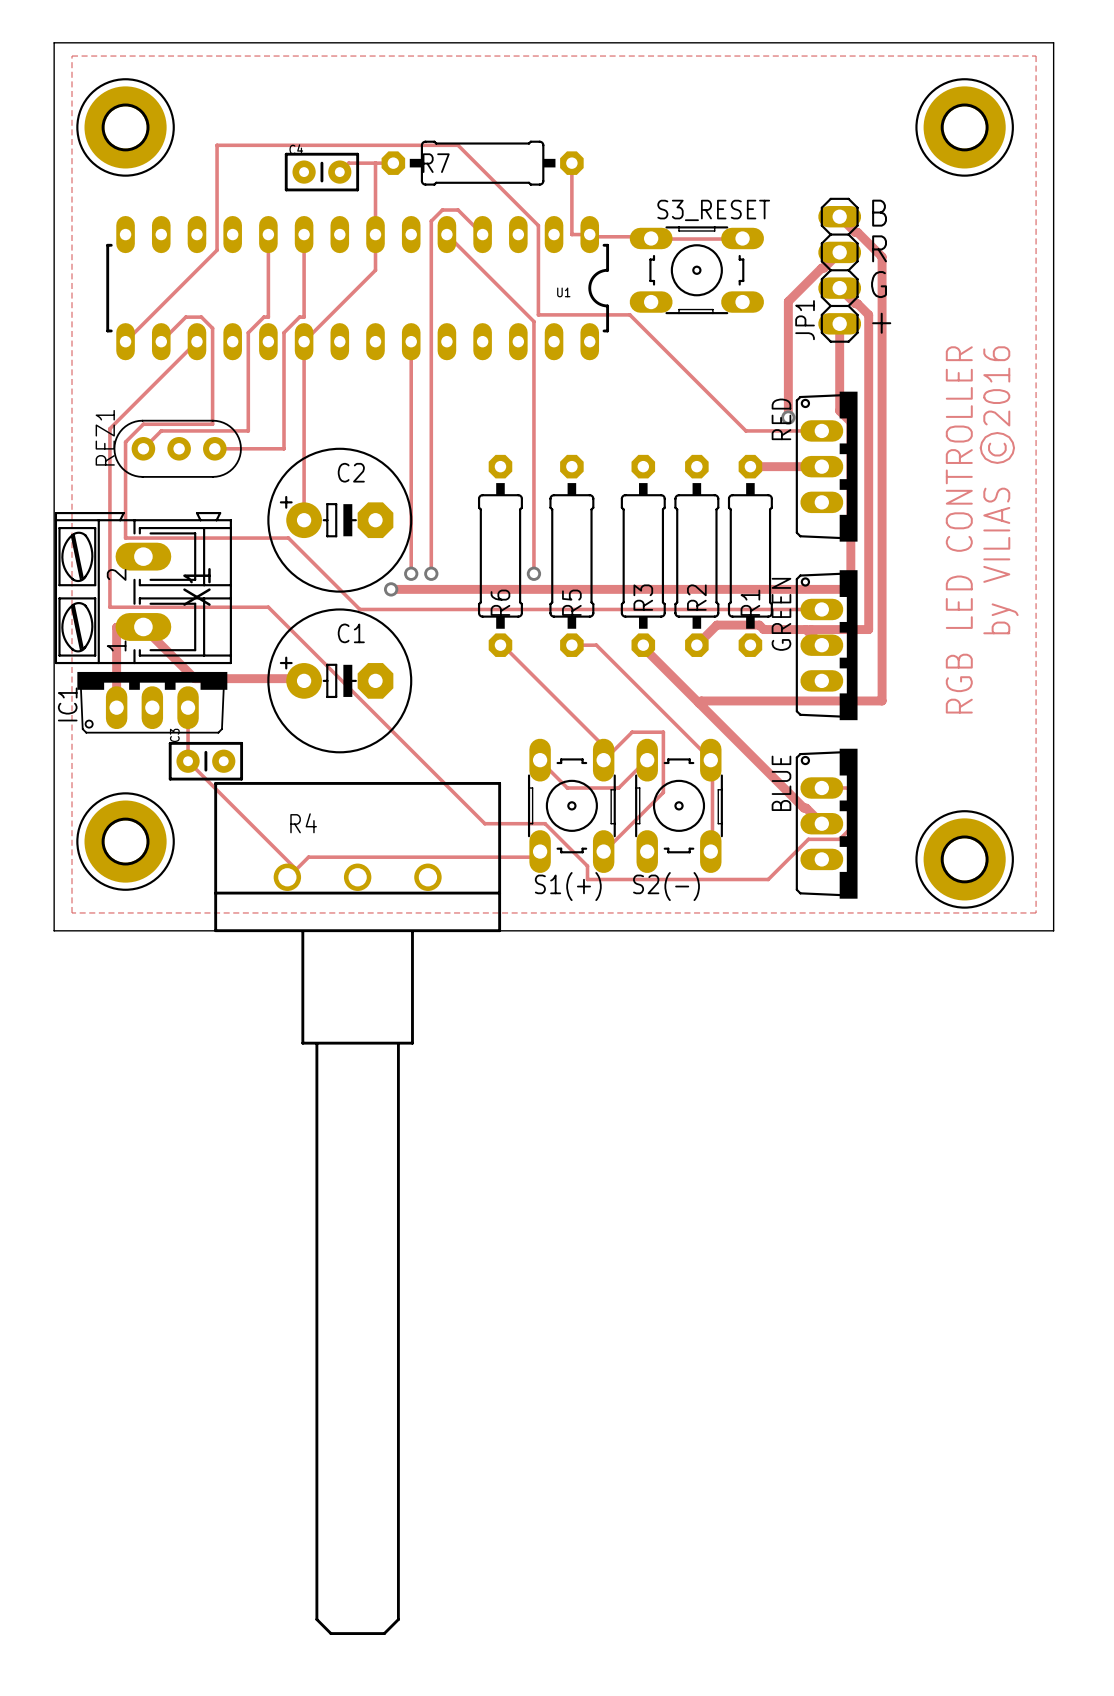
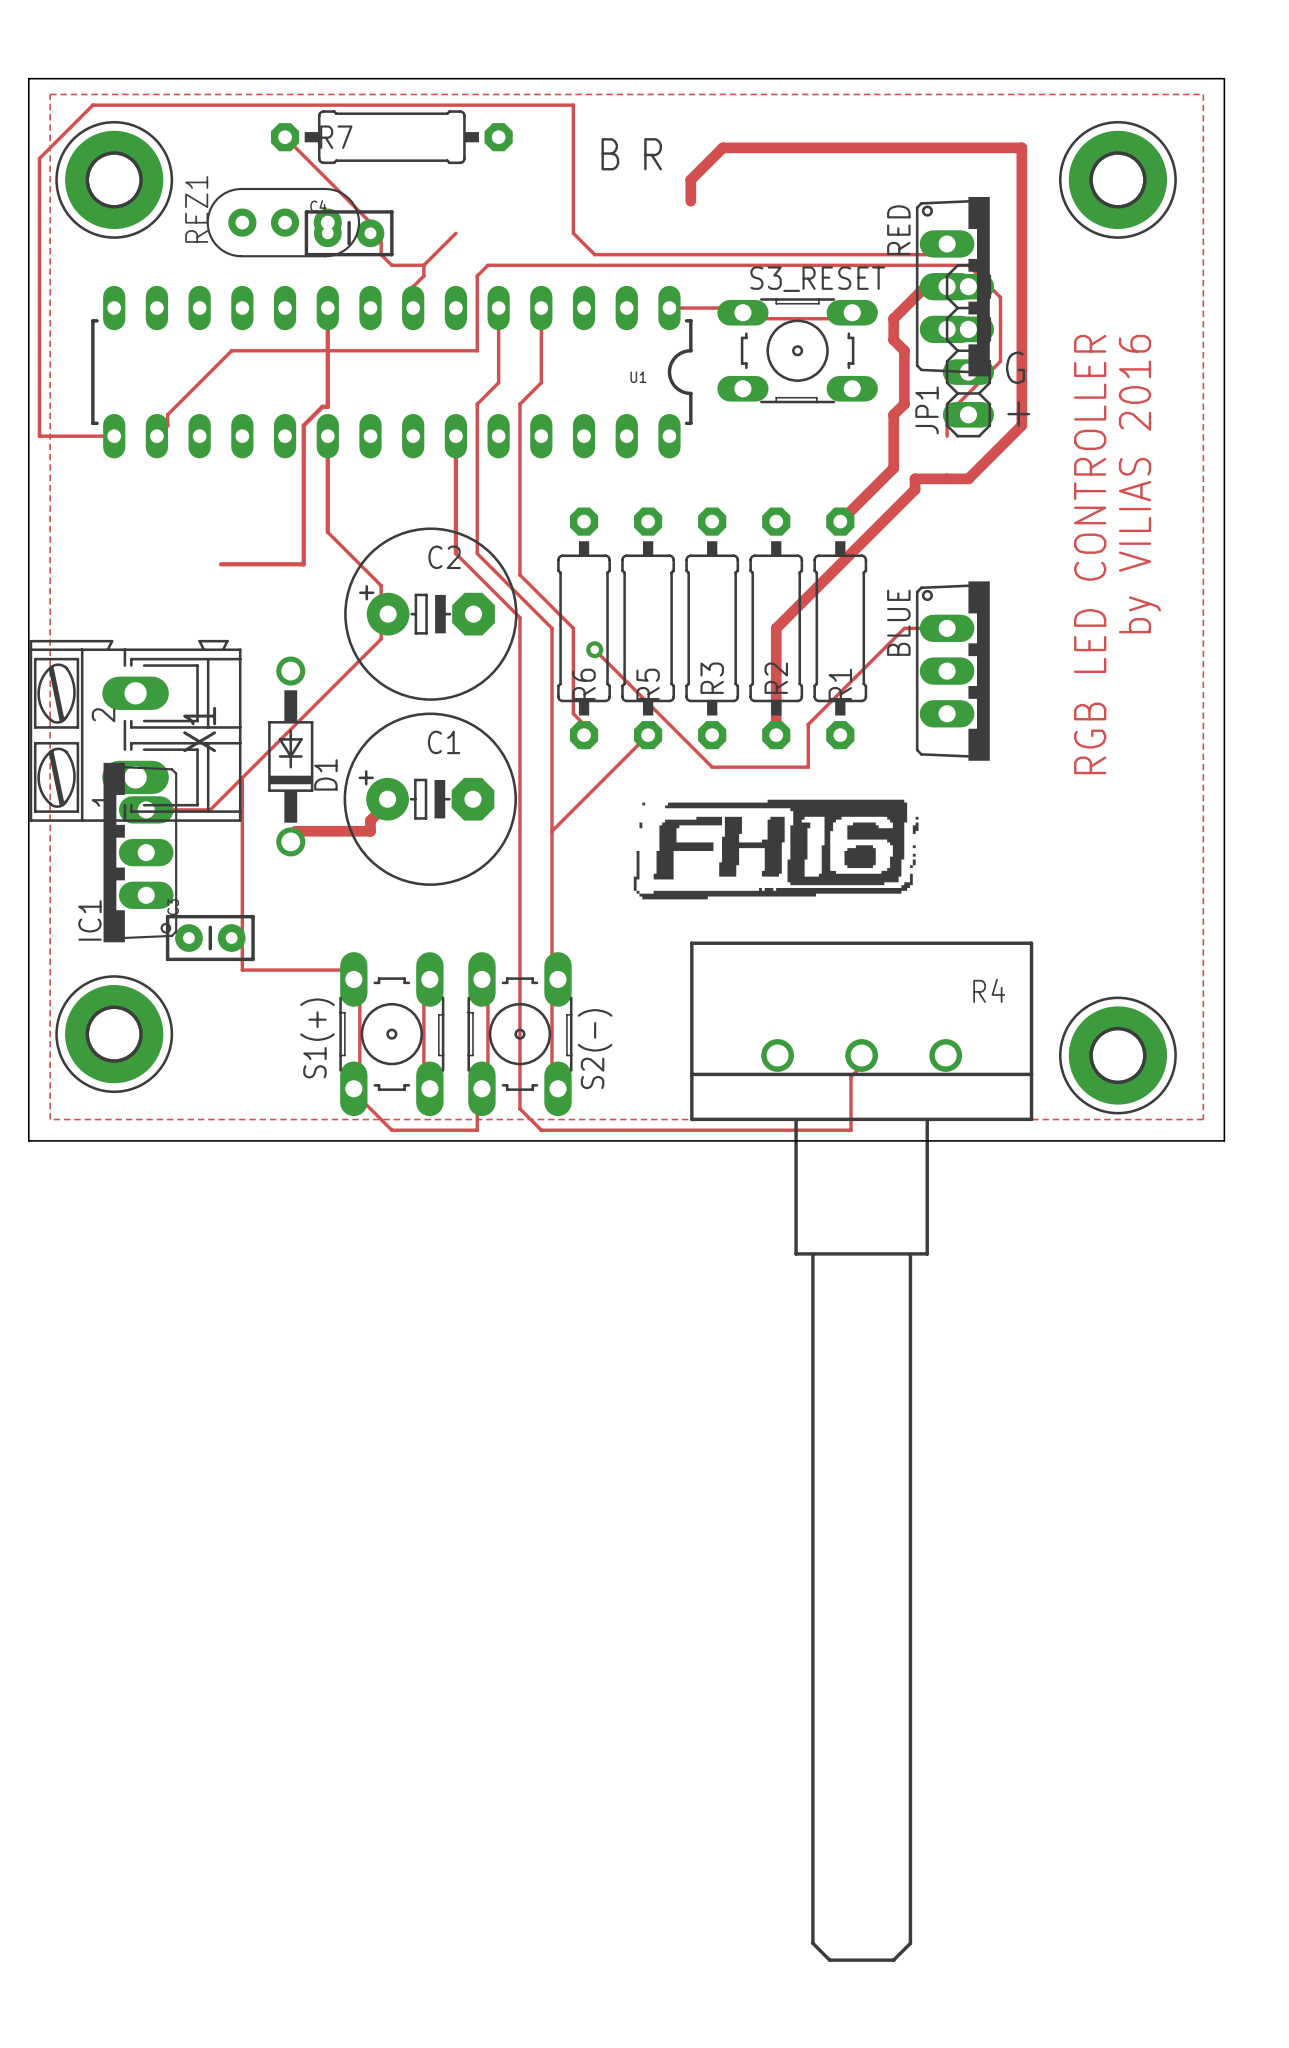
track: none -> (285, 137) (381, 233) (381, 254) (391, 265) (423, 265)
text: none -> B (610, 154)
track: none -> (690, 201) (690, 179) (722, 147) (1021, 147) (1021, 425) (968, 478) (915, 478) (915, 489) (776, 628) (776, 735)
track: (375, 163) (375, 216) -> (423, 265) (423, 276) (413, 286)
track: (393, 163) (348, 163) (339, 172) -> none
R7 position: (482, 163) -> (391, 137)
track: (571, 163) (571, 234) (589, 234) (591, 236) (649, 236) (652, 239) (742, 238) -> (669, 308) (733, 308) (742, 312) (744, 318) (850, 318) (852, 312)
track: none -> (455, 233) (423, 265)
text: B (879, 213) -> none
track: none -> (947, 286) (925, 286) (893, 318) (893, 340) (904, 350) (904, 404) (893, 414) (893, 468) (840, 521)
RED: none -> (952, 286)
track: (839, 216) (882, 256) (882, 700) (701, 700) (699, 703) -> none
track: (268, 234) (268, 317) (263, 317) (248, 332) (248, 430) (161, 430) (143, 448) -> none
track: (375, 234) (375, 270) (304, 341) -> none
track: (446, 234) (533, 321) (533, 573) -> (498, 308) (498, 382) (477, 404) (477, 553) (552, 628) (552, 831)
track: (482, 234) (458, 210) (442, 210) (431, 221) (431, 573) -> (541, 308) (541, 382) (519, 404) (519, 574) (573, 628) (573, 713) (584, 724) (584, 735)
text position: R (879, 248) -> R (653, 154)
track: (839, 252) (788, 301) (788, 417) -> none
track: (839, 288) (868, 314) (868, 629) (810, 629) (808, 631) -> none
track: (839, 323) (839, 410) (850, 422) (850, 589) (391, 589) -> none
track: (170, 332) (185, 317) (201, 317) (212, 328) (212, 424) (143, 424) (125, 442) (125, 538) (288, 538) (359, 609) (821, 609) -> (167, 425) (167, 414) (231, 350) (477, 350) (477, 276) (487, 265) (968, 265) (1000, 297) (1000, 361) (947, 414) (947, 436)
track: (125, 341) (217, 250) (217, 145) (458, 145) (538, 225) (538, 314) (629, 314) (745, 430) (821, 430) -> (114, 436) (39, 436) (39, 158) (92, 105) (573, 105) (573, 233) (594, 254) (947, 254) (947, 243)
track: (196, 341) (109, 428) (109, 607) (268, 607) (484, 823) (545, 823) (587, 866) (587, 879) (768, 879) (808, 839) (839, 839) (848, 830) (848, 788) (821, 788) -> none
via: (788, 417) -> none
track: (304, 422) (304, 520) -> (327, 532) (381, 585) (381, 607) (388, 614) (381, 617) (381, 639) (210, 809) (146, 809)
track: (411, 439) (411, 573) -> (455, 553) (519, 617) (519, 1108) (541, 1130) (850, 1130) (850, 1076) (861, 1066) (861, 1055)
REZ1 position: (177, 448) -> (283, 222)
track: (750, 466) (821, 466) -> none
RED: (826, 466) -> none
text: by VILIAS ©2016 (999, 490) -> by VILIAS 2016 (1140, 484)
track: none -> (947, 628) (904, 628) (808, 724) (808, 767) (712, 767) (594, 649)
C2 position: (339, 520) -> (430, 614)
via: none -> (594, 649)
text position: RGB LED CONTROLLER (959, 529) -> RGB LED CONTROLLER (1090, 554)
BLUE: none -> (952, 671)
R6 position: (500, 555) -> (584, 628)
R5 position: (571, 555) -> (648, 628)
R3 position: (643, 555) -> (712, 628)
R2 position: (696, 555) -> (776, 628)
R1 position: (750, 555) -> (840, 628)
via: (411, 573) -> none
via: (431, 573) -> none
via: (533, 573) -> none
via: (391, 589) -> none
track: none -> (648, 735) (552, 831)
D1: none -> (290, 756)
track: none -> (242, 777) (242, 970) (349, 970) (353, 979) (359, 980) (359, 1087) (353, 1088) (359, 1098) (391, 1130) (477, 1130) (477, 1098) (481, 1088) (487, 1087) (487, 980) (481, 979)
track: none -> (387, 799) (381, 799) (381, 809) (370, 820) (370, 831) (295, 831) (290, 841)
track: (500, 645) (502, 645) (609, 752) (603, 760) (632, 732) (663, 732) (663, 792) (603, 851) -> none
drawing: none -> [633, 799, 919, 900]
track: (571, 645) (596, 645) (712, 761) (712, 850) (710, 851) -> none
track: (643, 645) (643, 647) (821, 823) -> none
track: (696, 645) (716, 625) (759, 625) (763, 629) (806, 629) (821, 645) -> none
GREEN: (826, 645) -> none
IC1 footprint: [77, 671, 228, 734] -> [103, 762, 178, 943]
track: none -> (552, 831) (552, 970) (557, 979) (552, 980) (552, 1087) (557, 1088)
track: (304, 680) (301, 678) (194, 678) (143, 626) (116, 627) (116, 707) -> none
C1 position: (339, 680) -> (430, 799)
IC1 name position: IC1 (67, 704) -> IC1 (89, 920)
track: (188, 707) (188, 761) (295, 868) (287, 877) (308, 857) (533, 857) (540, 851) -> none
S1(+) footprint: [527, 738, 616, 873] -> [339, 952, 445, 1117]
S2(-) footprint: [635, 738, 723, 873] -> [467, 952, 573, 1117]
track: (540, 760) (567, 788) (618, 788) (647, 760) -> none
track: none -> (429, 979) (423, 980) (423, 1087) (429, 1088)
R4 name position: R4 (303, 823) -> R4 (989, 990)
BLUE: (826, 823) -> none
S1(+) name position: S1(+) (568, 886) -> S1(+) (317, 1038)
S2(-) name position: S2(-) (666, 886) -> S2(-) (595, 1049)
R4 position: (357, 1208) -> (861, 1451)

